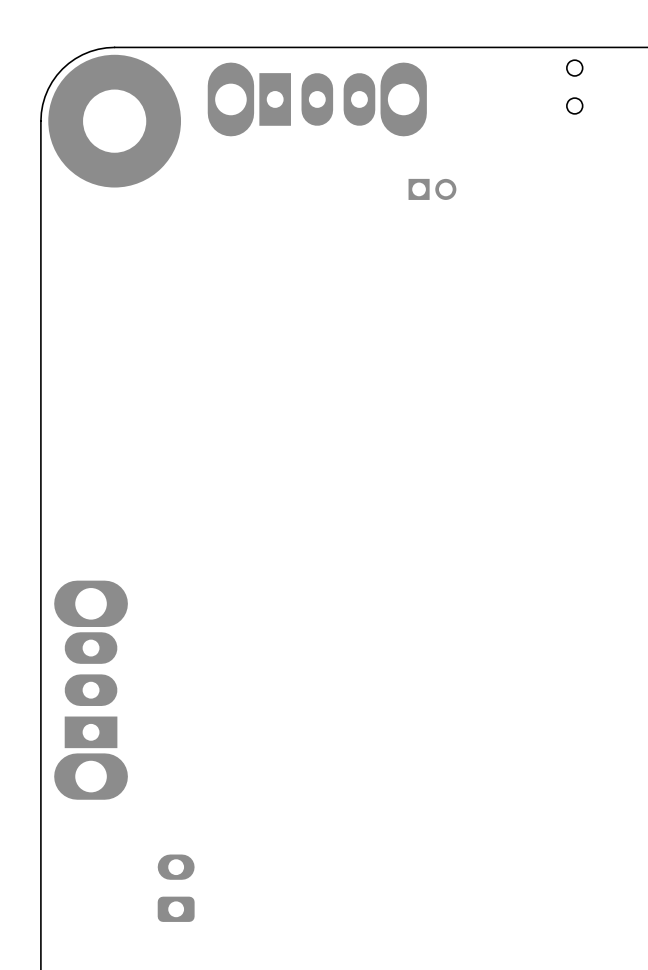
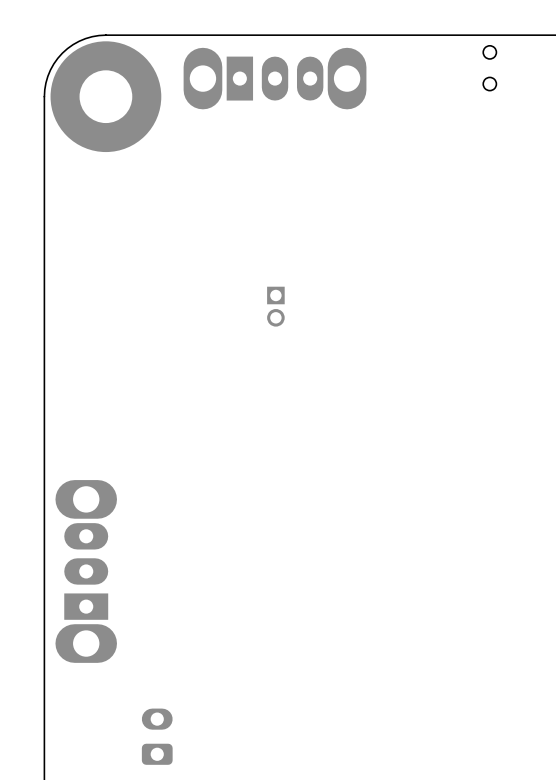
part rotation: 0° (432, 189) -> 90° clockwise (275, 306)
part position: (432, 189) -> (275, 306)

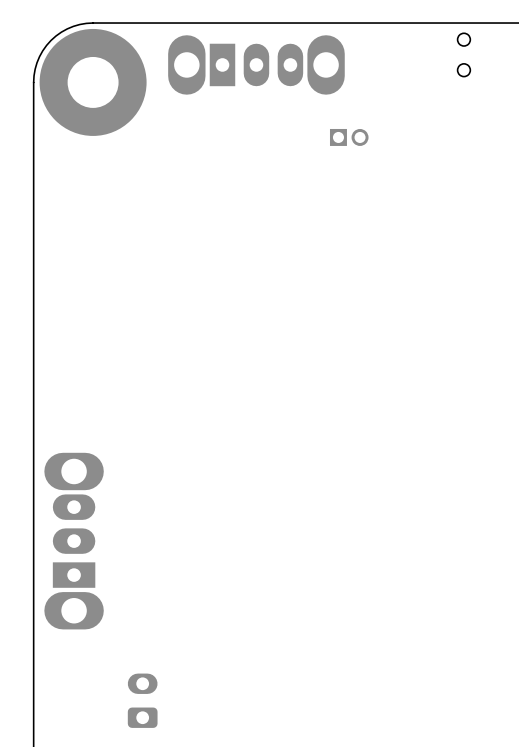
part rotation: 0° (275, 306) -> 90° counterclockwise (349, 137)
part position: (275, 306) -> (349, 137)

